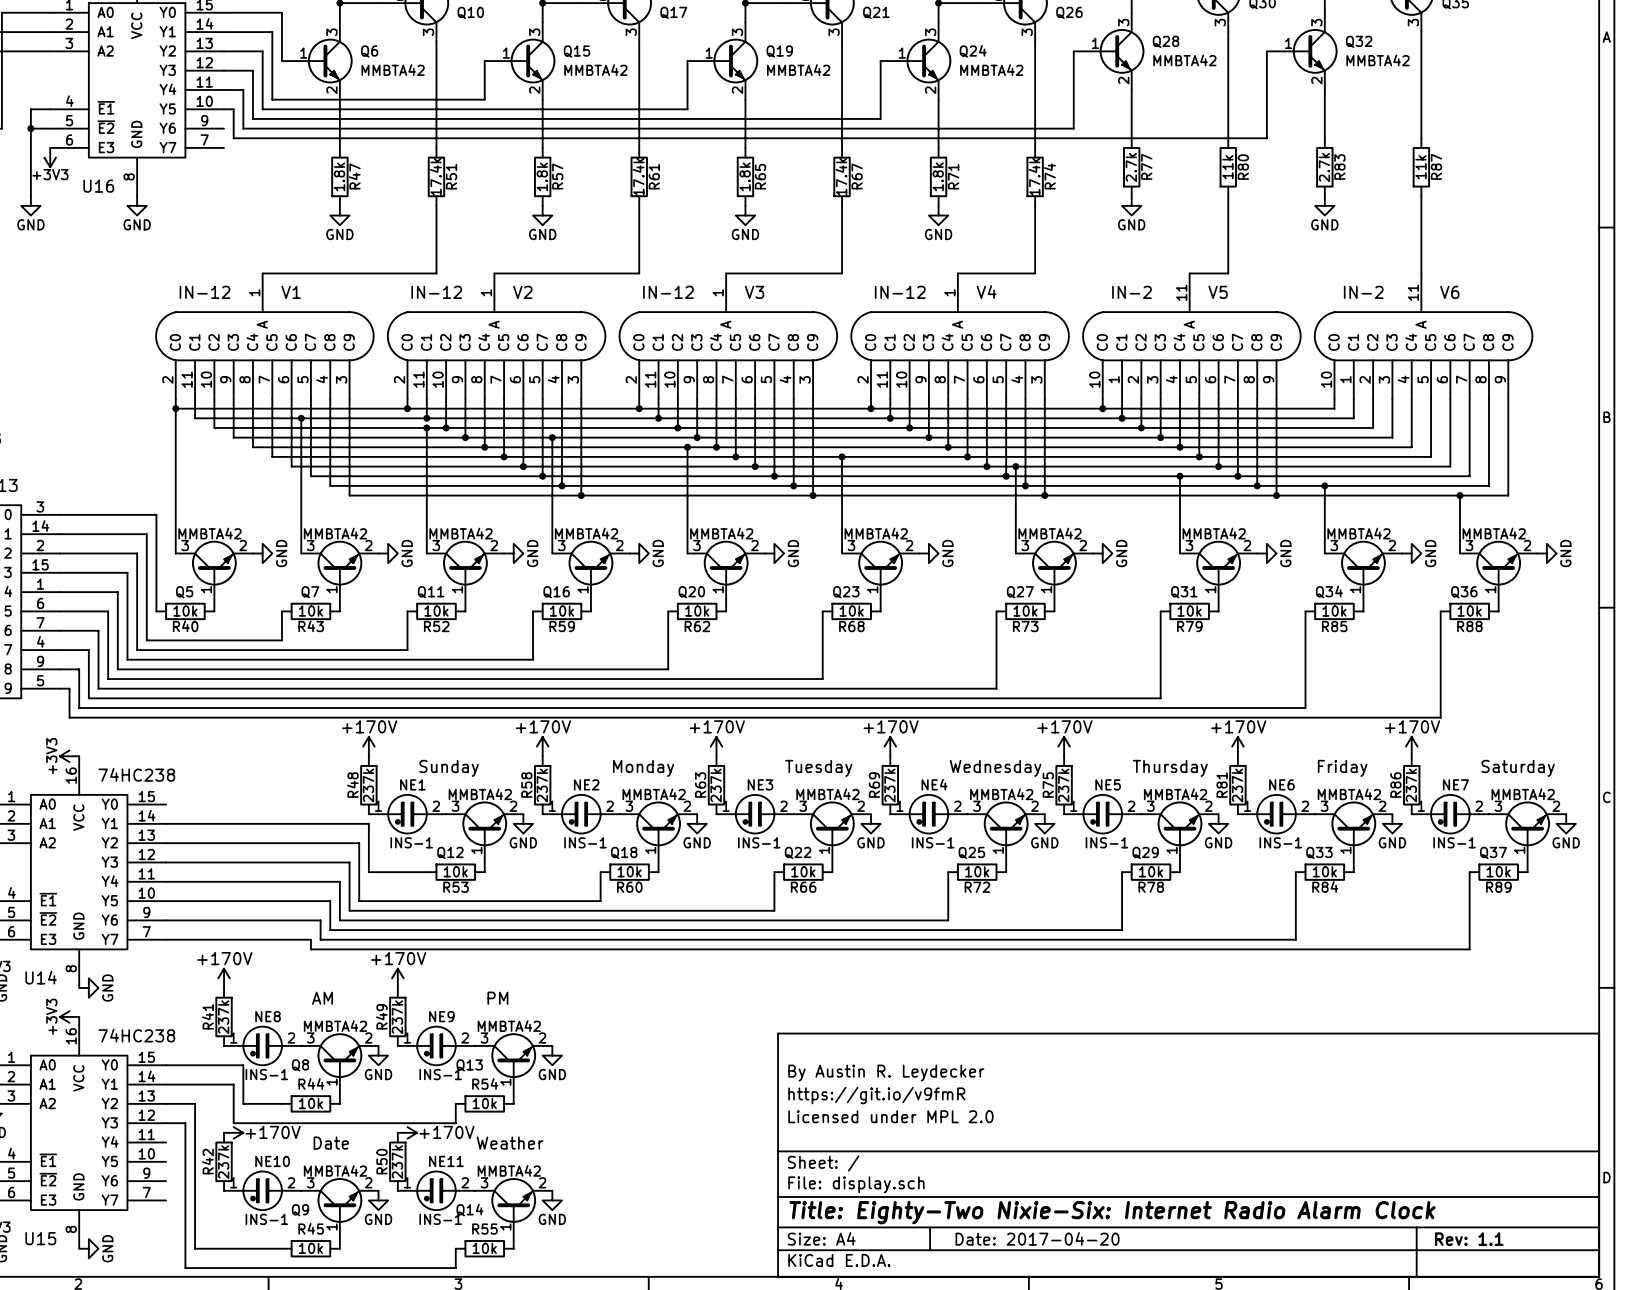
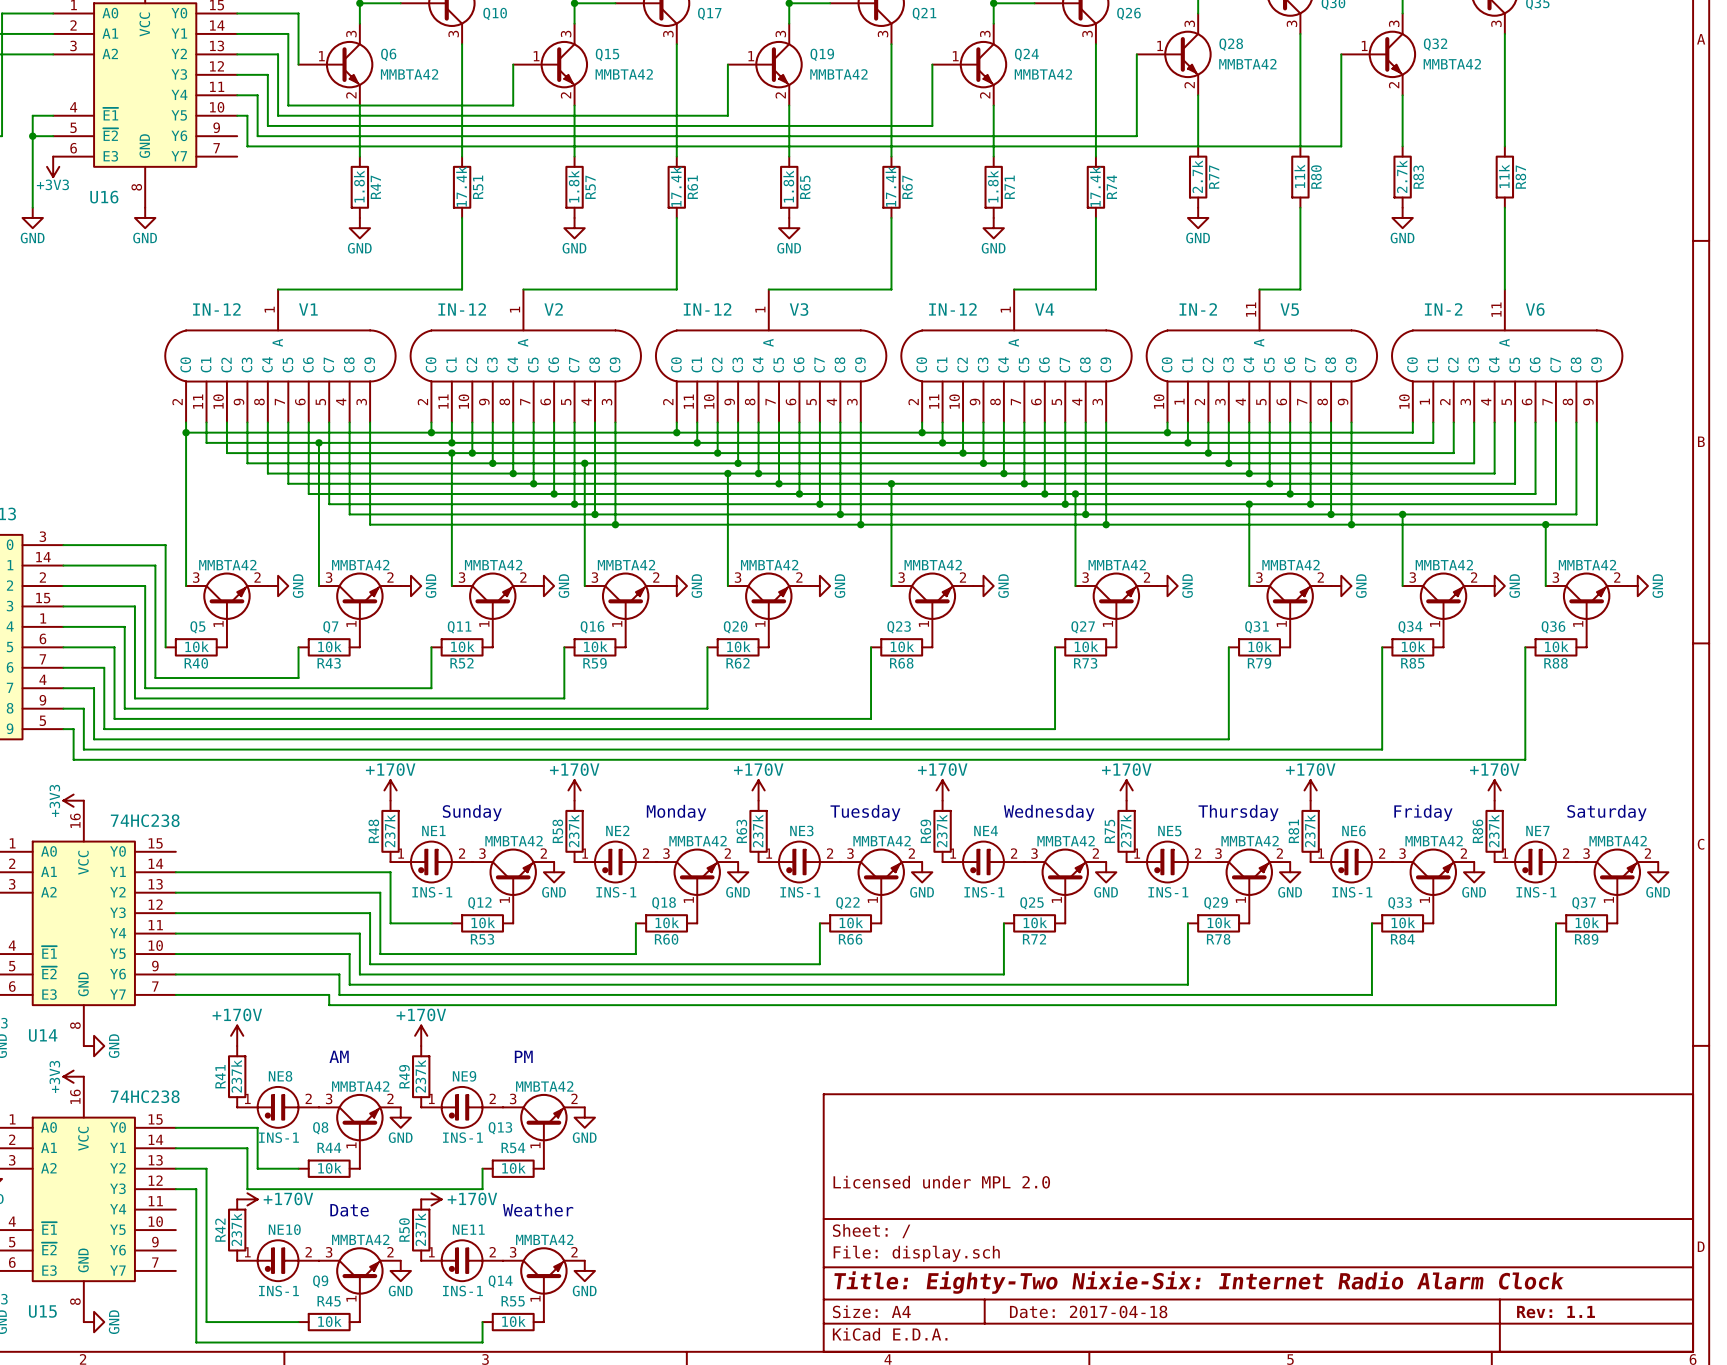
title block: By Austin R. Leydecker (886, 1073) -> none
title block: https://git.io/v9fmR (876, 1095) -> none
title block: Date: 2017-04-20 (1037, 1238) -> Date: 2017-04-18 (1088, 1311)

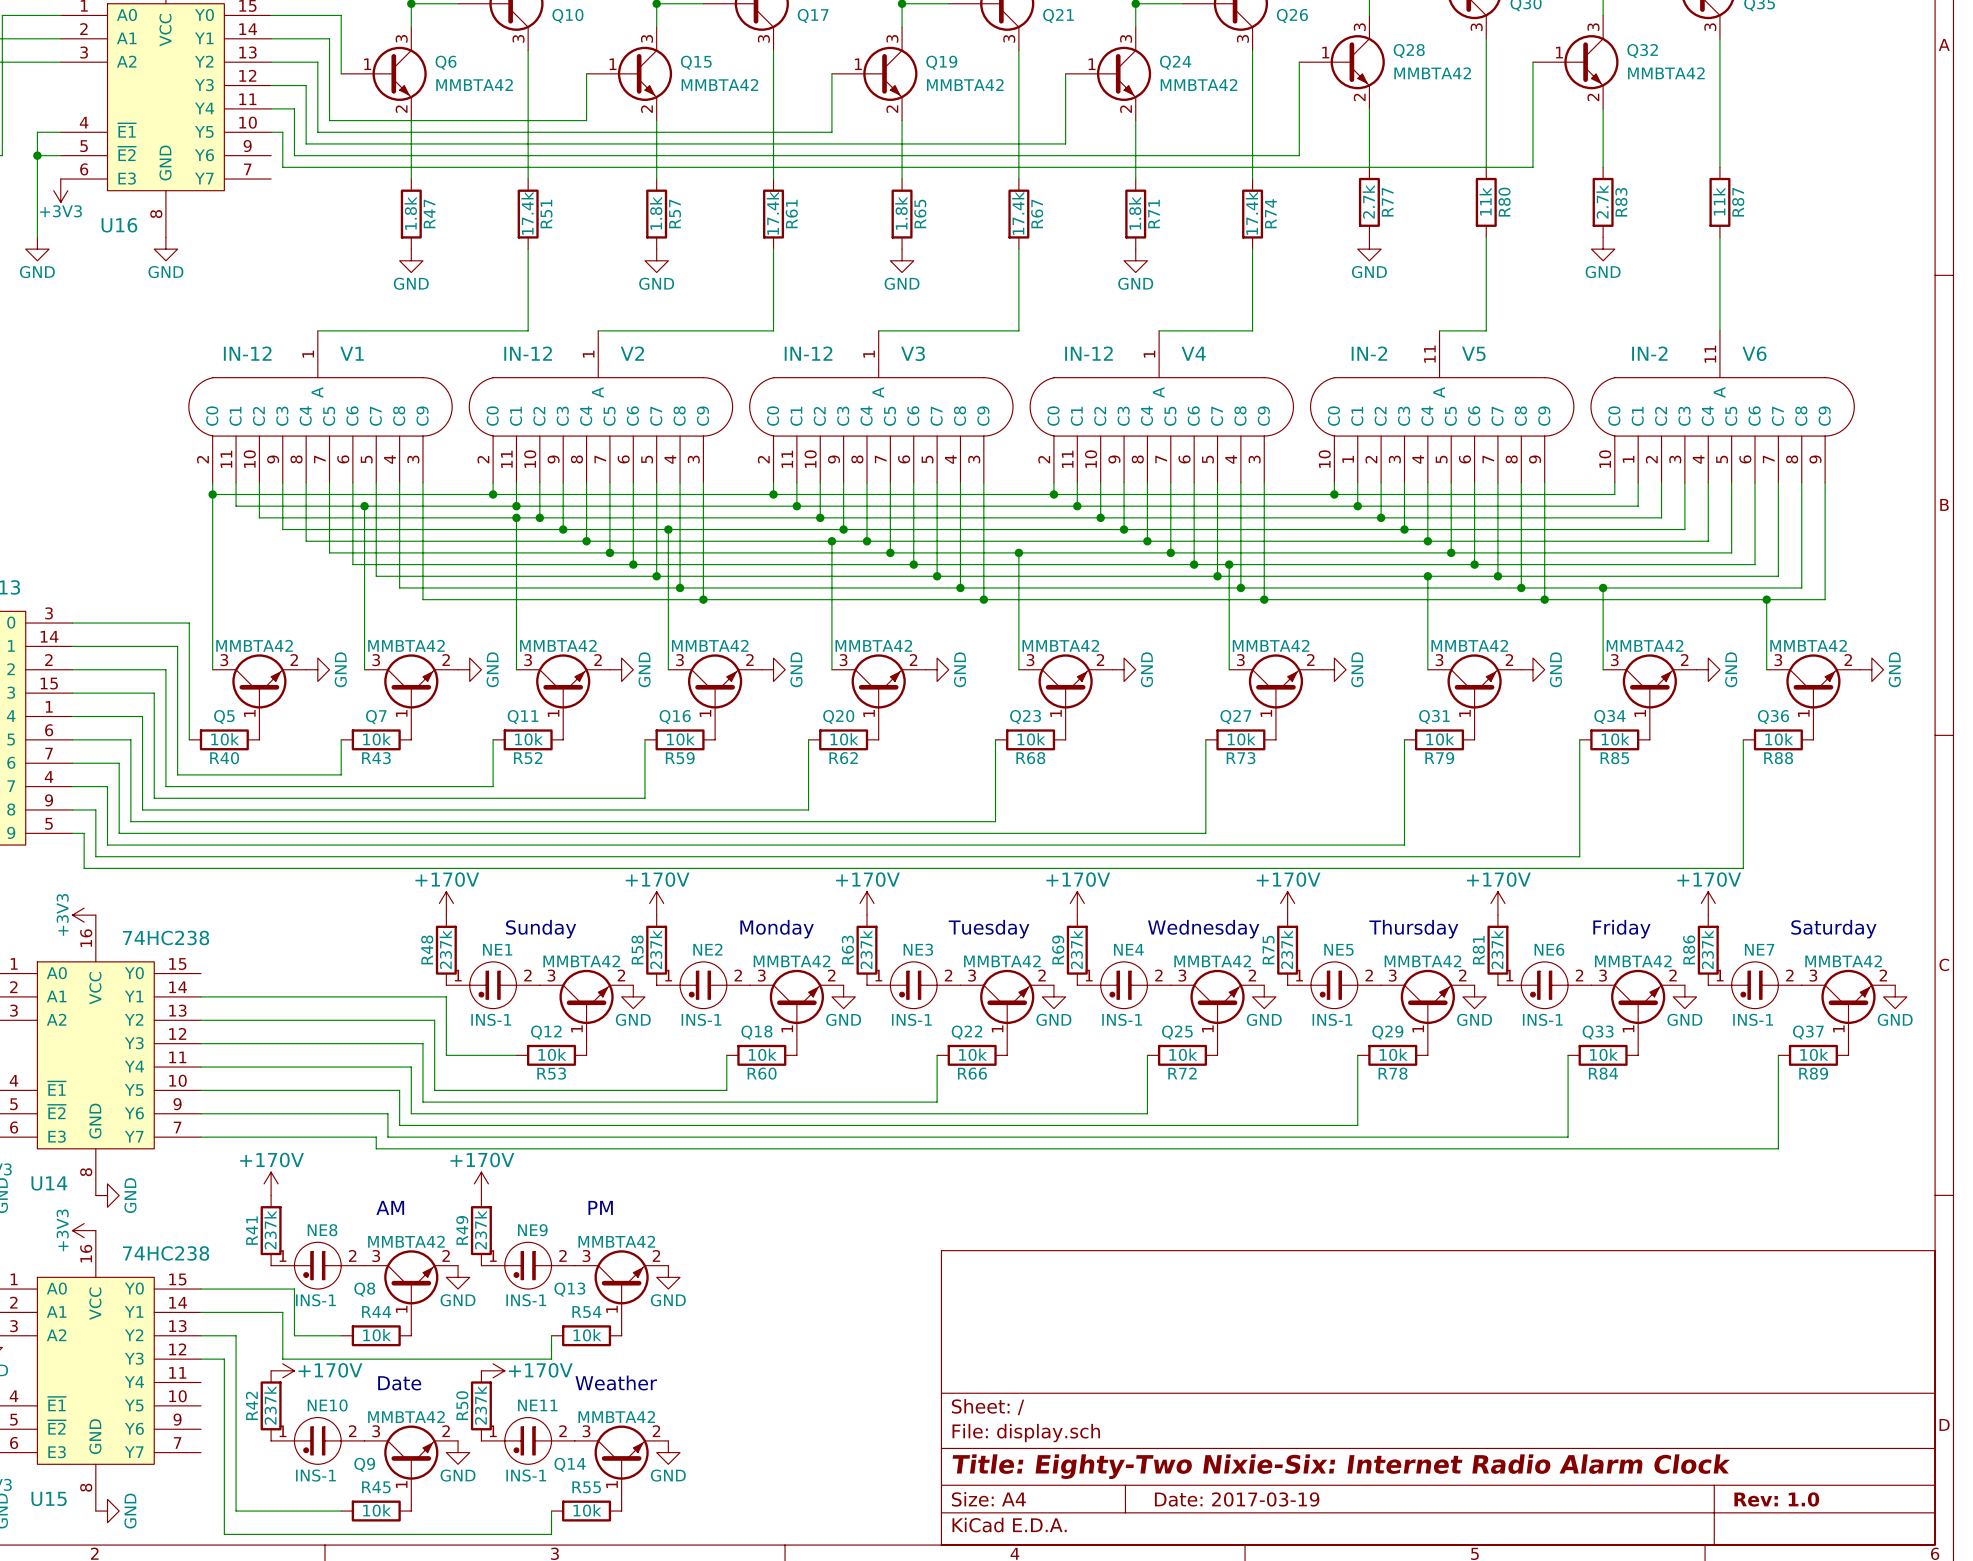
title block: Licensed under MPL 2.0 (941, 1182) -> none
title block: Date: 2017-04-18 (1088, 1311) -> Date: 2017-03-19 (1237, 1499)
title block: Rev: 1.1 (1556, 1312) -> Rev: 1.0 (1776, 1499)

